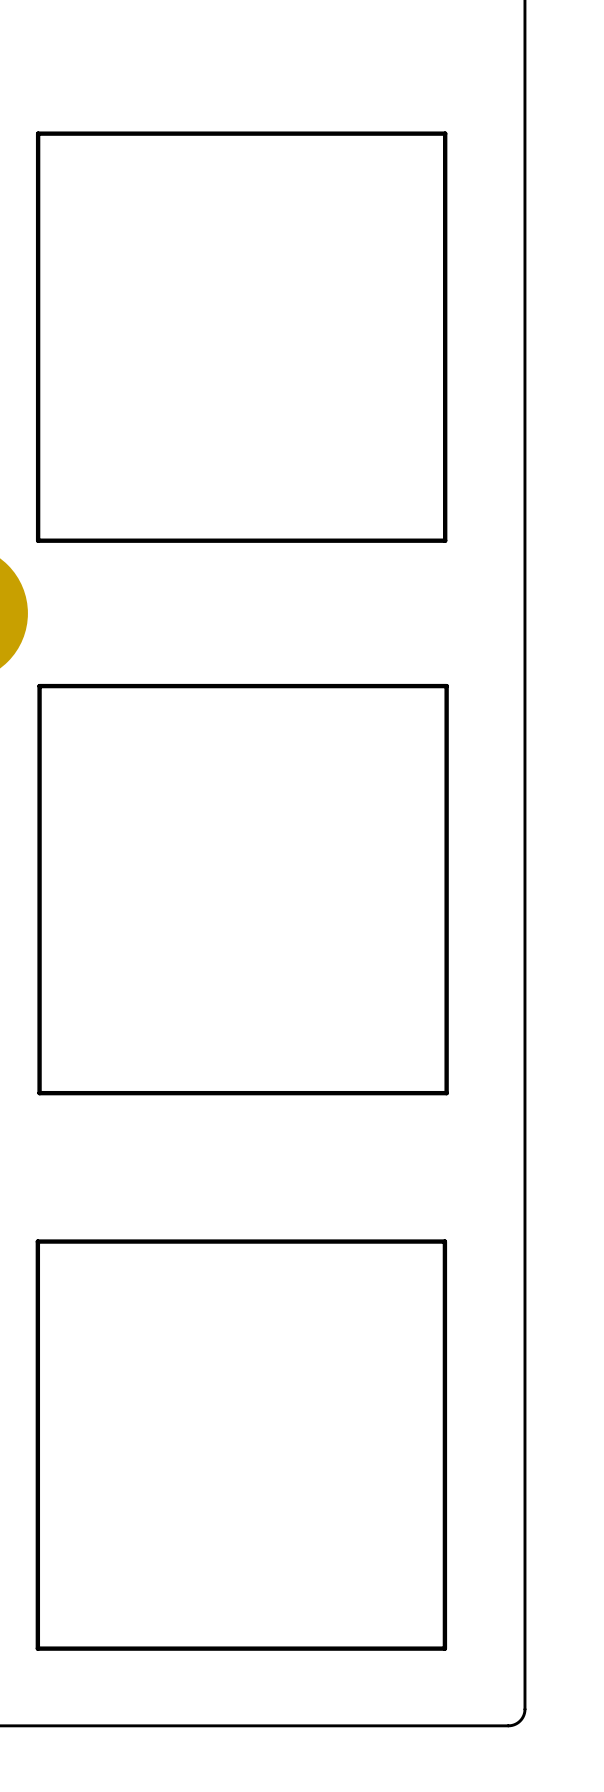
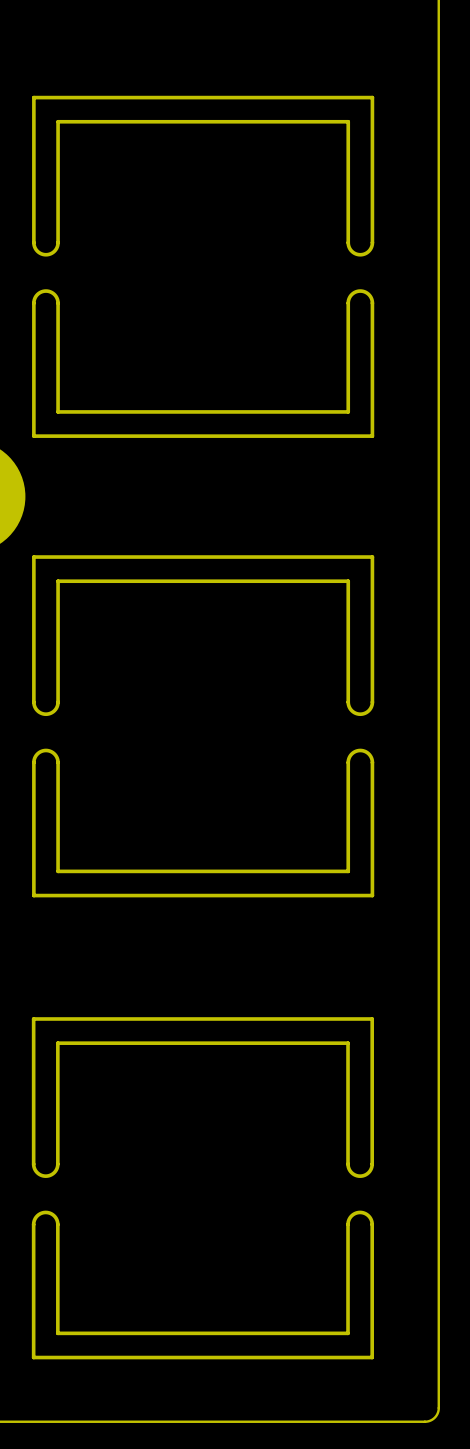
board edge: (38, 308) (38, 380) -> (33, 242) (36, 250) (44, 254) (53, 252) (57, 245) (58, 121) (348, 121) (348, 245) (353, 252) (361, 254) (369, 250) (372, 242)
board edge: (445, 308) (445, 380) -> (33, 303) (36, 295) (44, 291) (52, 293) (57, 300) (58, 411) (348, 411) (348, 300) (353, 293) (361, 291) (369, 295) (372, 303)
board edge: (39, 686) (39, 1093) -> (35, 557) (33, 703) (38, 711) (45, 714) (53, 711) (57, 703) (58, 581) (348, 581) (348, 703) (354, 712) (364, 713) (370, 708) (372, 702) (372, 557)
board edge: (445, 686) (445, 1093) -> (35, 895) (33, 761) (37, 753) (45, 750) (53, 753) (57, 761) (58, 871) (348, 871) (348, 761) (353, 752) (364, 751) (370, 755) (372, 762) (372, 895)
board edge: (37, 1416) (37, 1488) -> (33, 1164) (37, 1172) (44, 1176) (53, 1173) (57, 1167) (57, 1043) (348, 1043) (348, 1167) (352, 1173) (361, 1176) (369, 1171) (372, 1164)
board edge: (444, 1416) (444, 1488) -> (33, 1224) (36, 1217) (44, 1212) (53, 1214) (57, 1221) (57, 1333) (348, 1333) (348, 1221) (353, 1214) (361, 1212) (369, 1216) (372, 1224)

